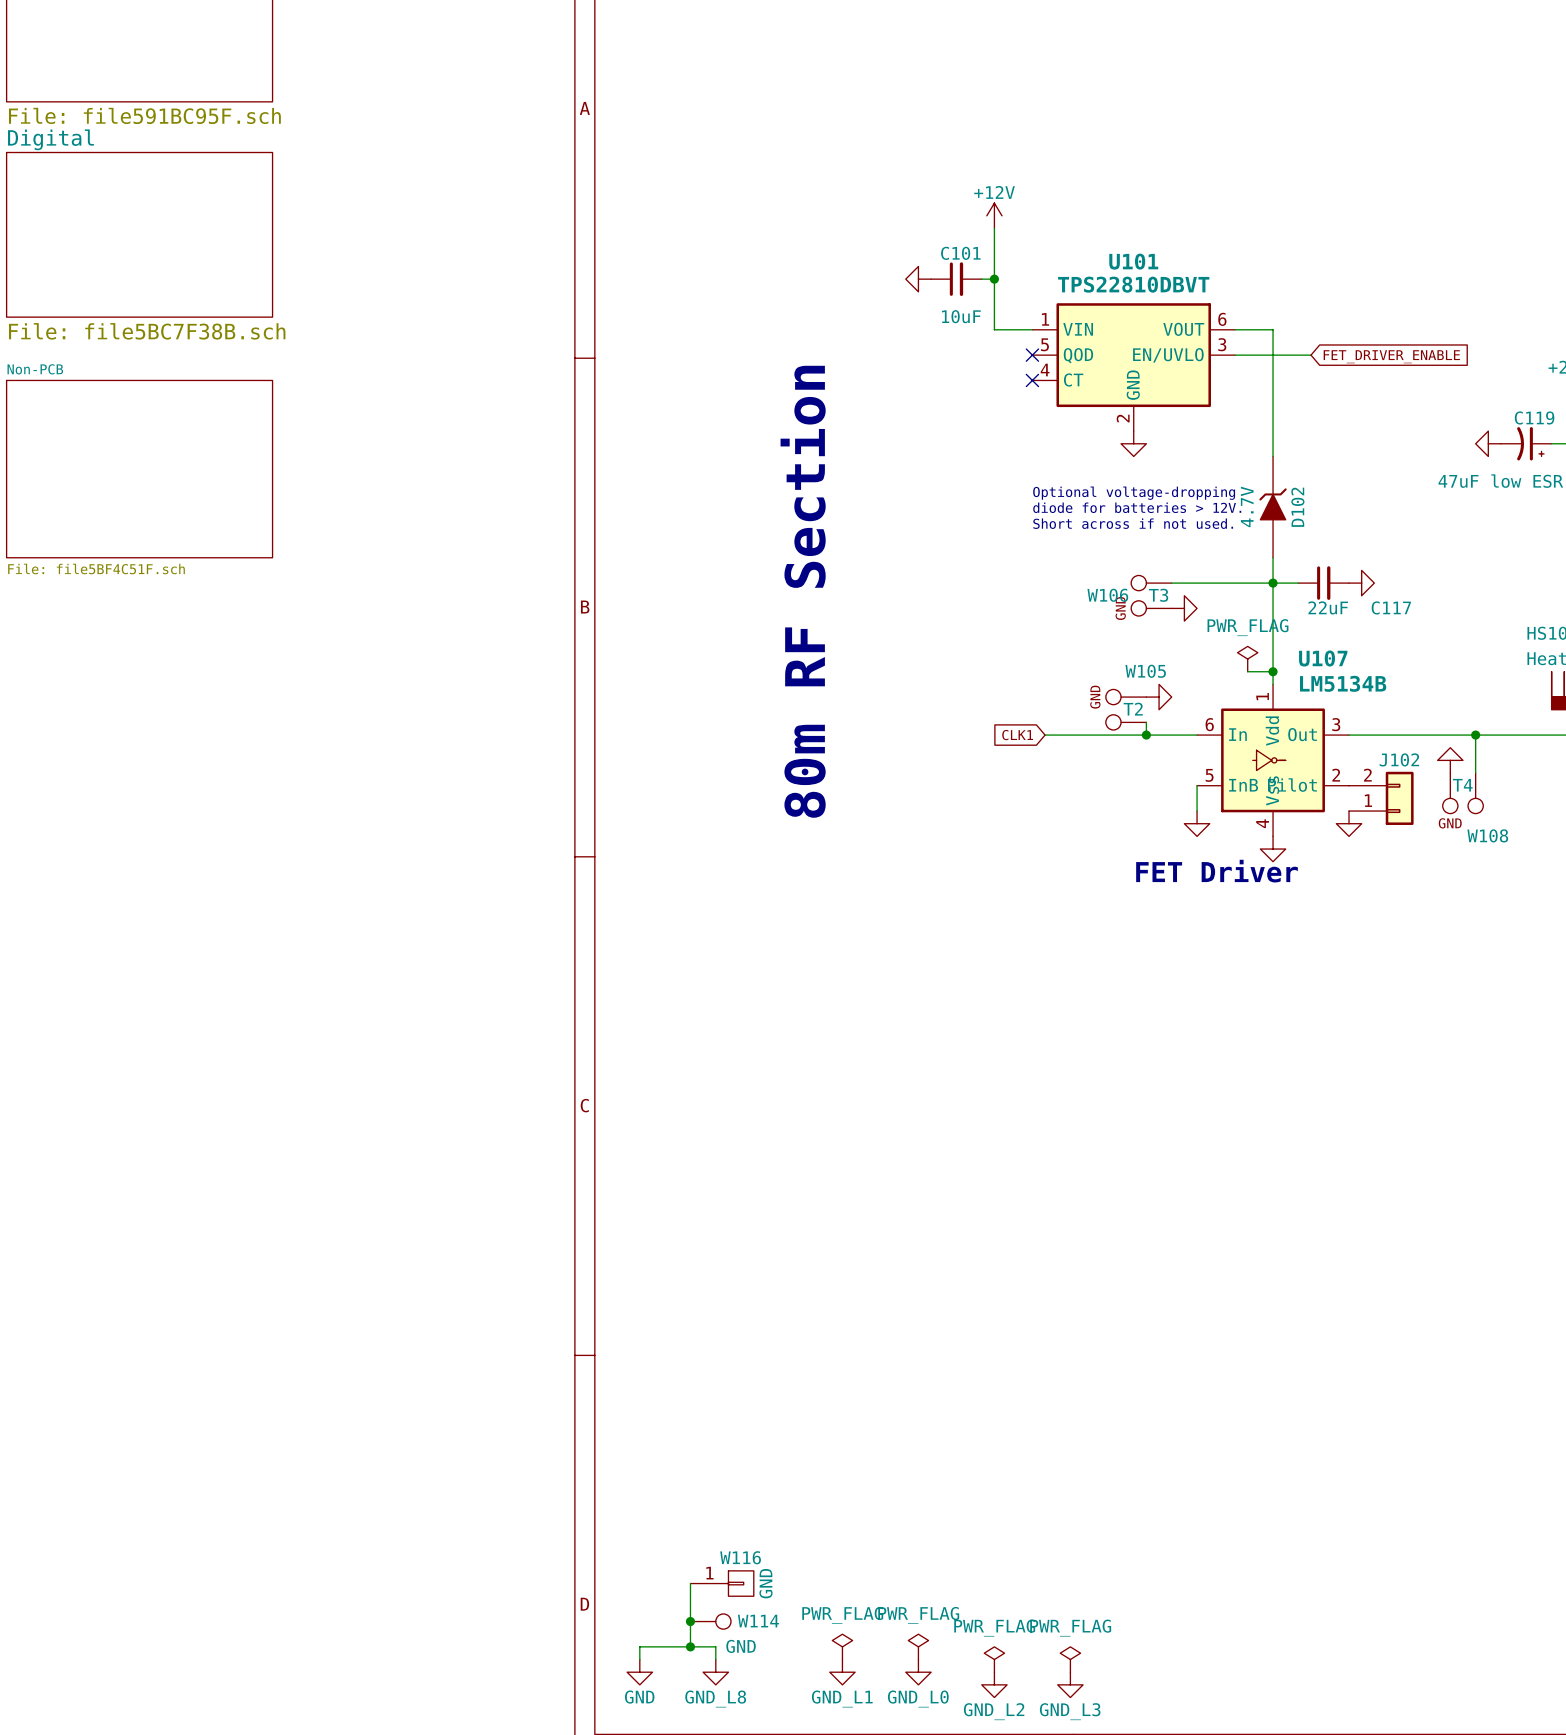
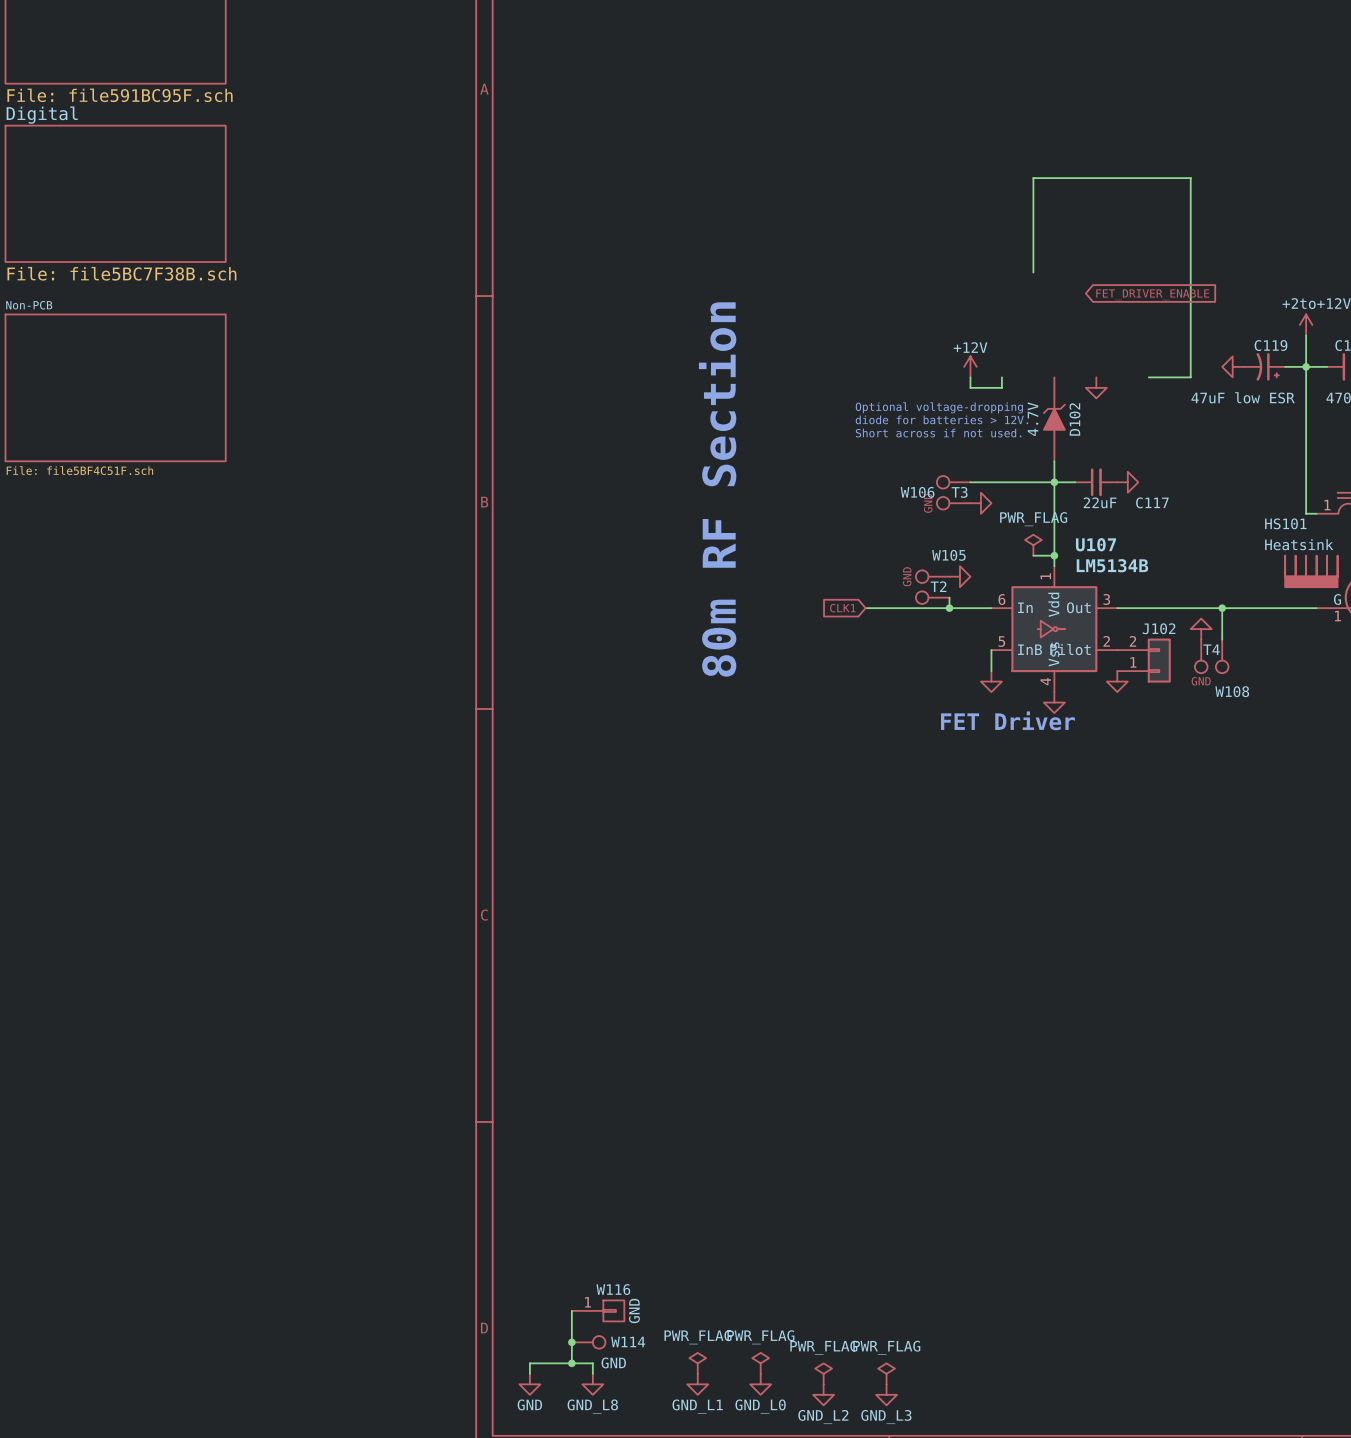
power symbol: +12V (994, 215) -> none
wire: (994, 228) (994, 329) (1032, 329) -> none
power symbol: (918, 279) -> none
C101: 10uF (956, 279) -> none
wire: (981, 279) (994, 279) -> none
junction: (994, 279) -> none
wire: (1235, 329) (1273, 329) (1273, 456) -> none
wire: none -> (1033, 272) (1033, 178) (1190, 178) (1190, 377) (1148, 377)
no-connect mark: (1032, 355) -> none
wire: (1235, 355) (1311, 355) -> none
U101: TPS22810DBVT (1133, 367) -> none
no-connect mark: (1032, 380) -> none
power symbol position: (1133, 443) -> (1096, 387)
power symbol: none -> +12V (970, 366)
wire: none -> (970, 377) (970, 387) (1001, 387) (1001, 377)
text position: 80m RF Section (803, 591) -> 80m RF Section (717, 489)

